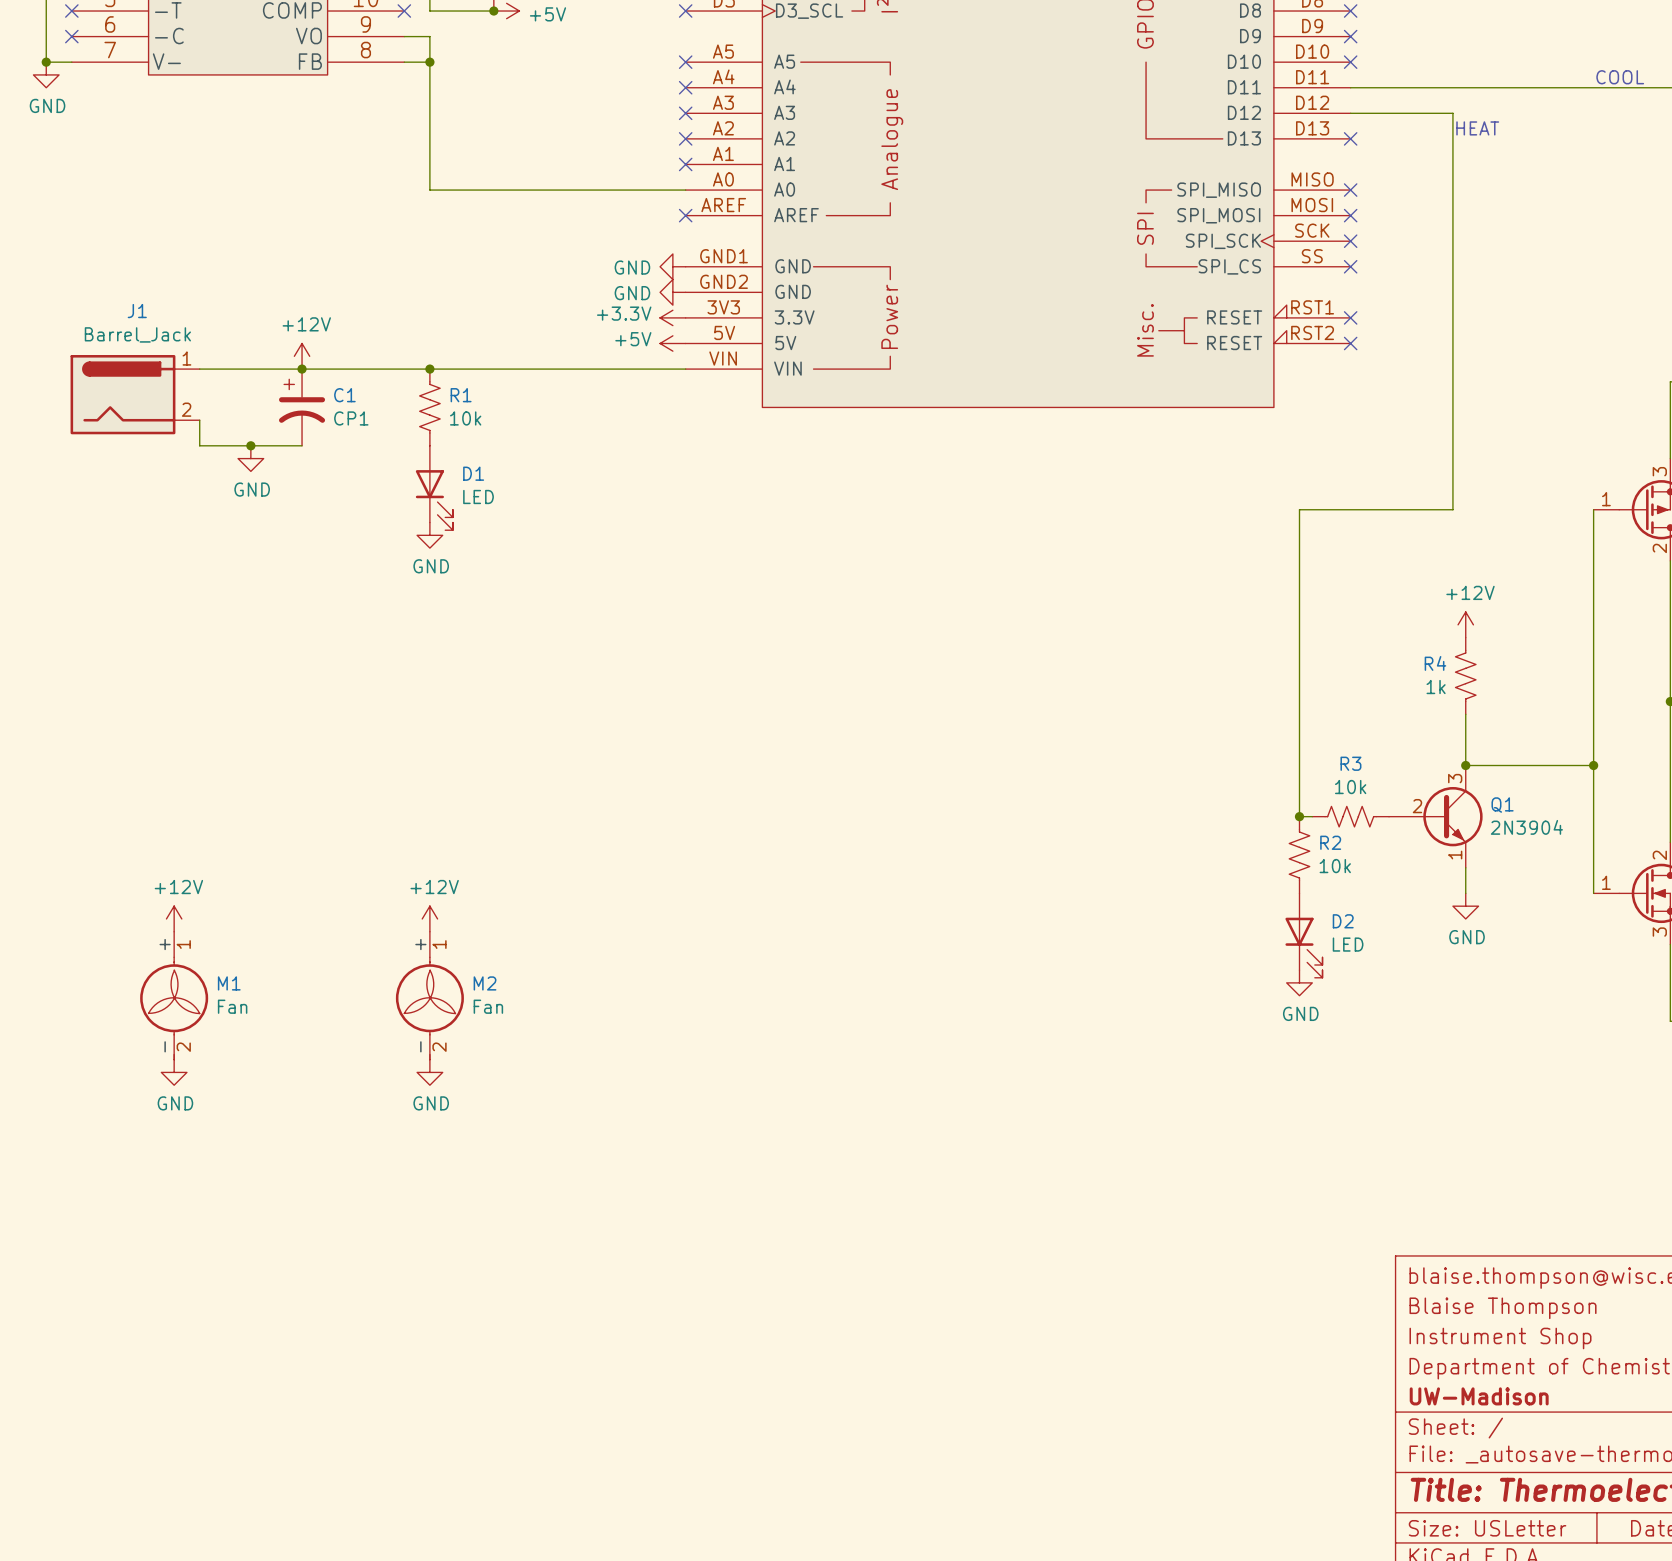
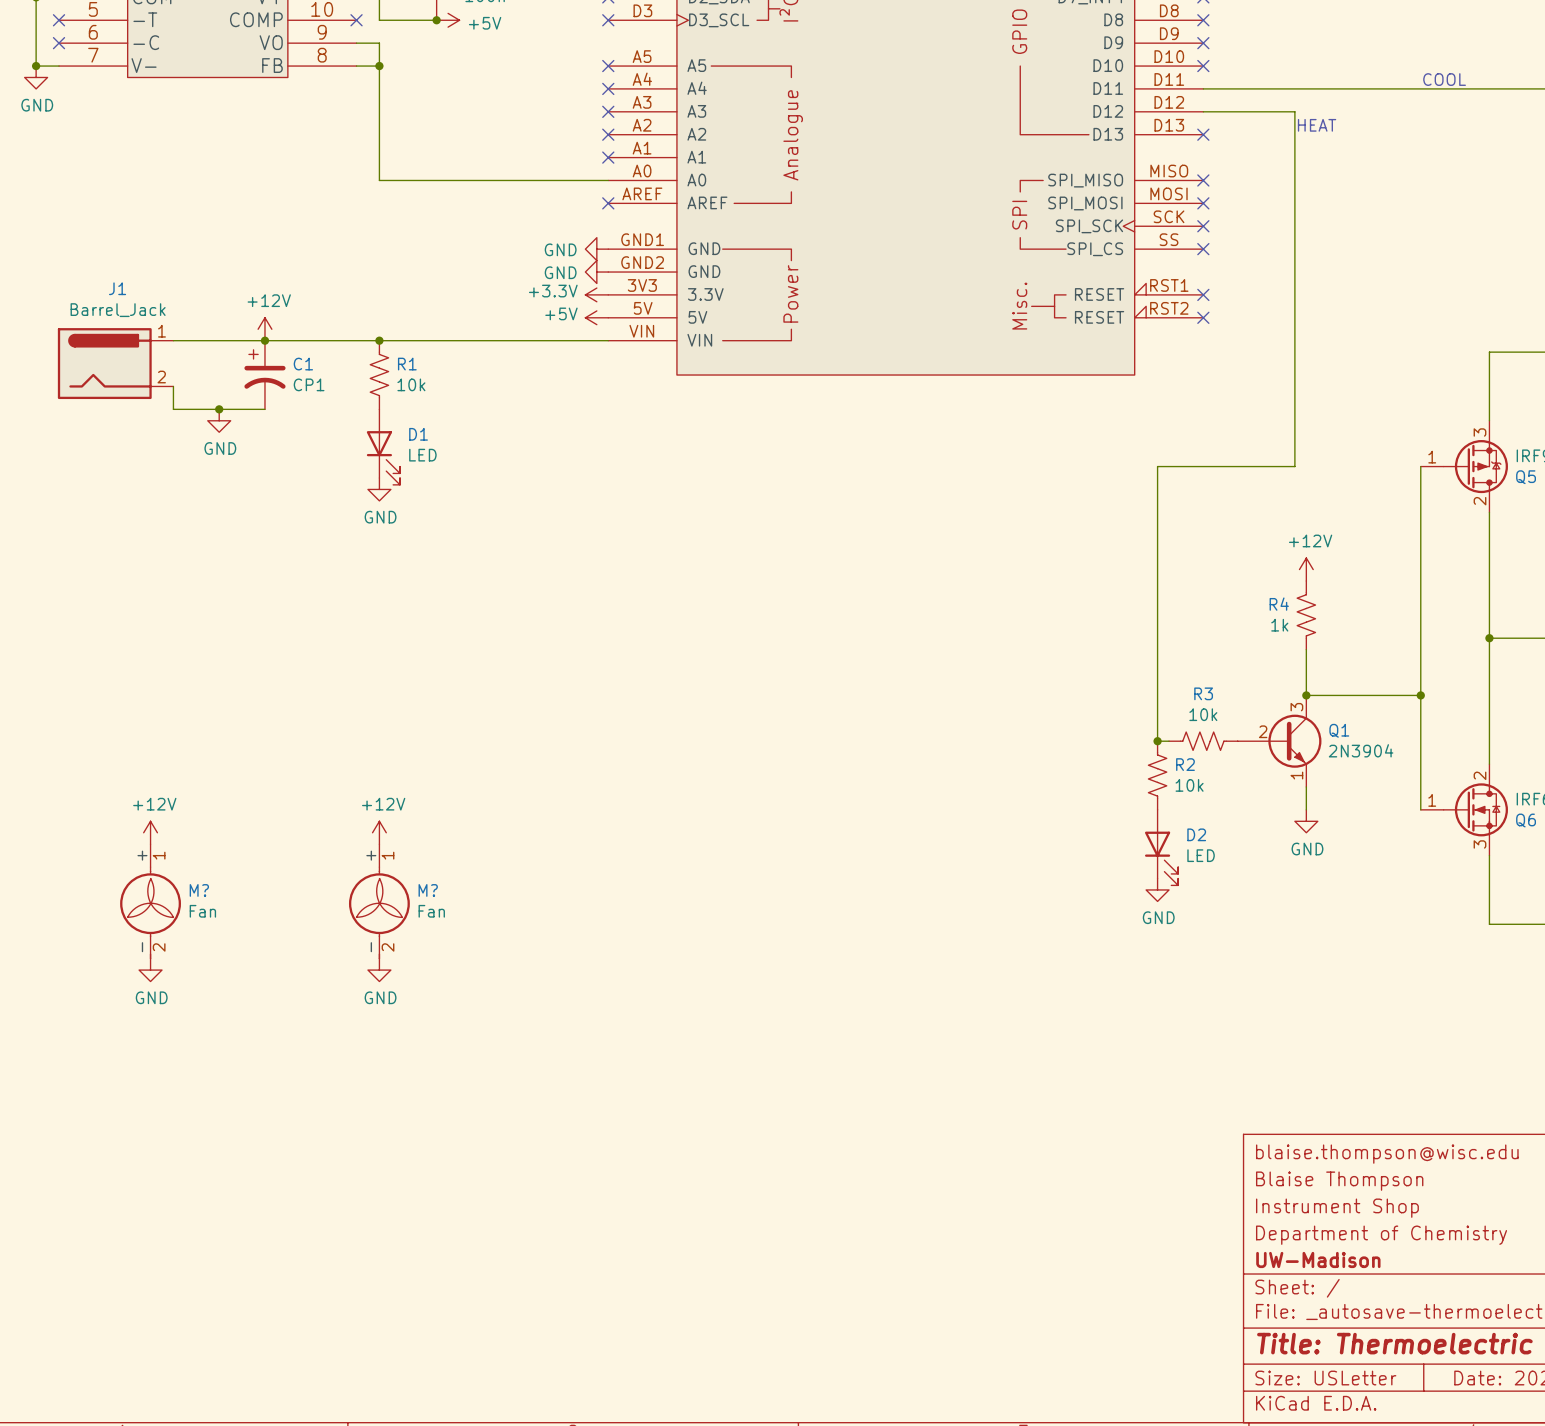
M1 name: M1 (229, 983) -> M? (199, 890)
M2 name: M2 (485, 983) -> M? (428, 890)

